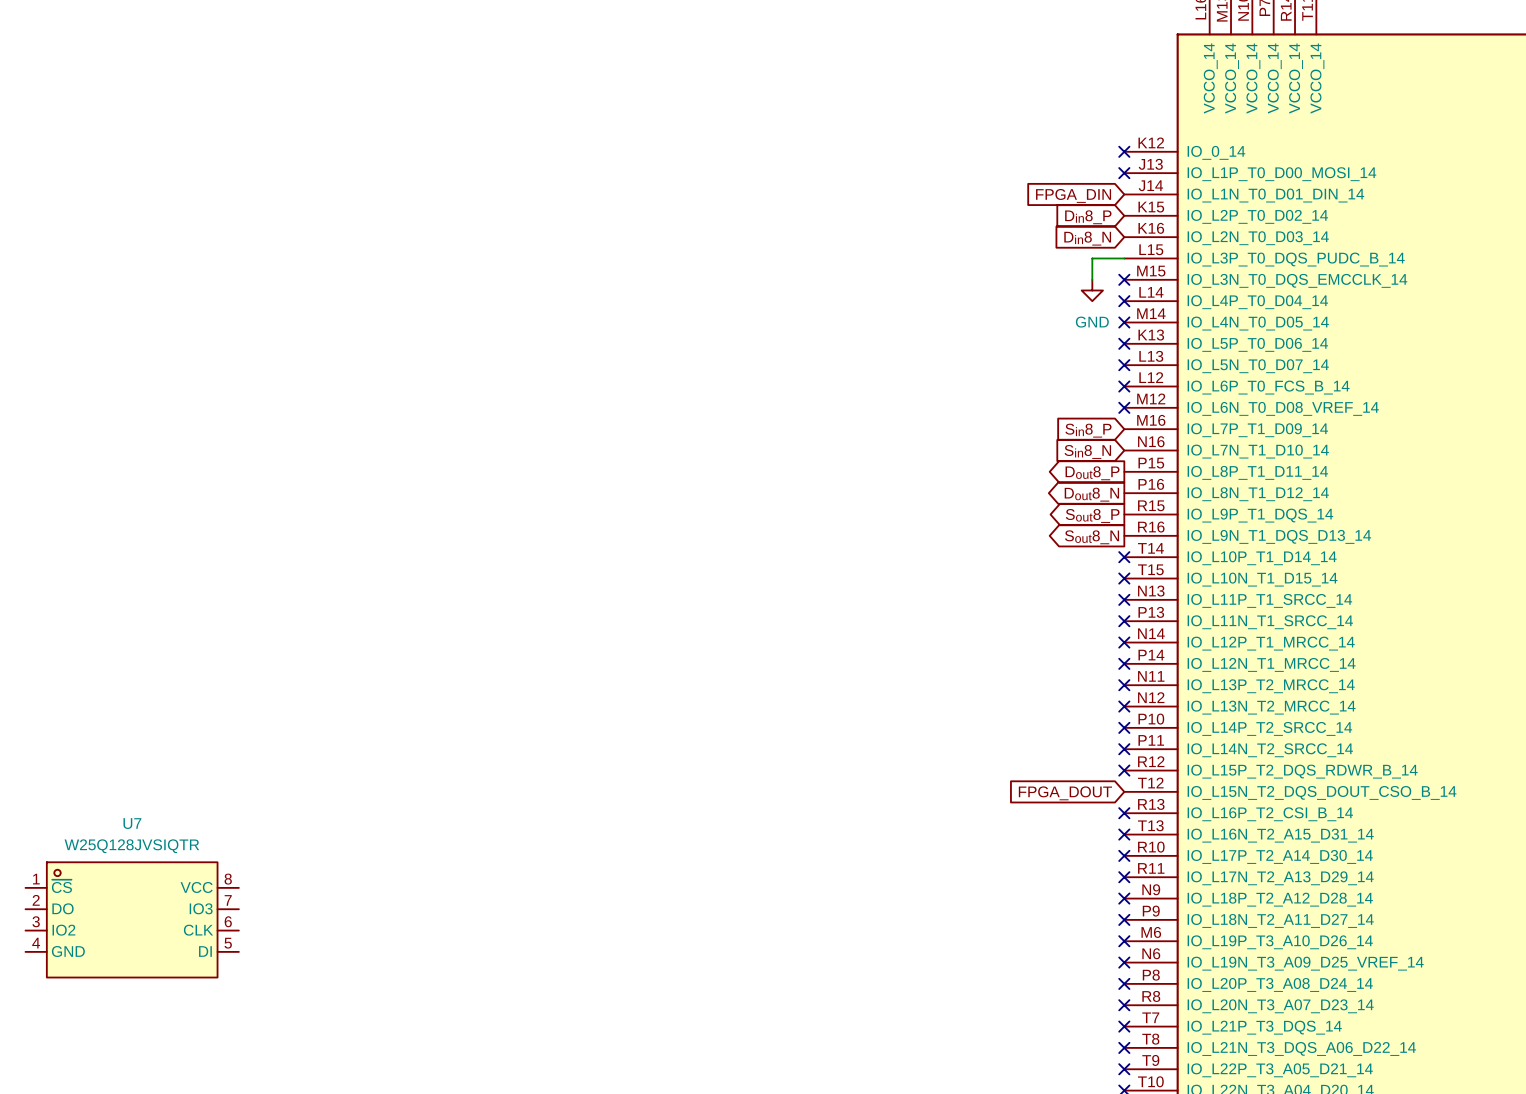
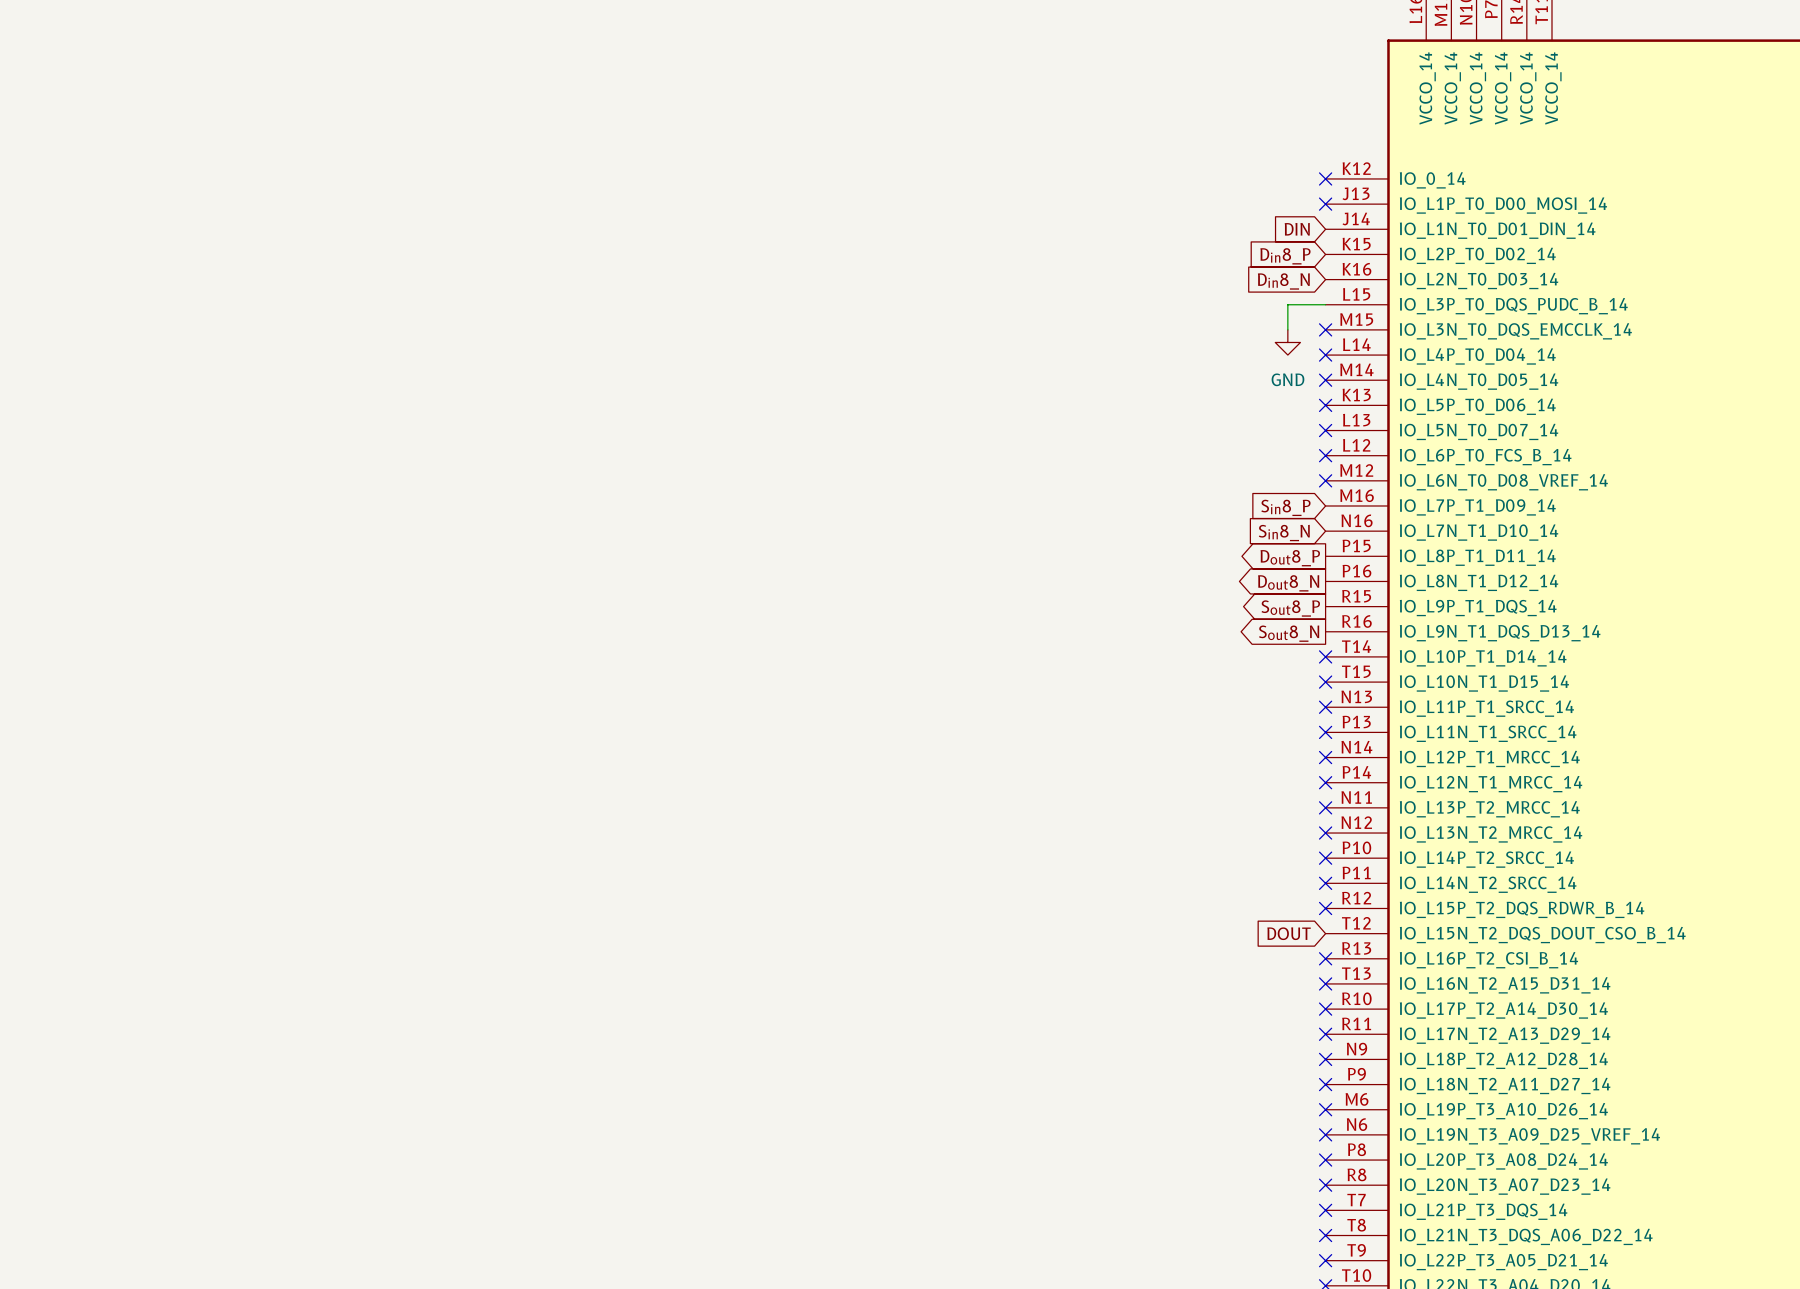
global label: FPGA_DIN (1073, 195) -> DIN (1297, 229)
global label: FPGA_DOUT (1065, 793) -> DOUT (1289, 933)
U7: W25Q128JVSIQTR (132, 919) -> none

